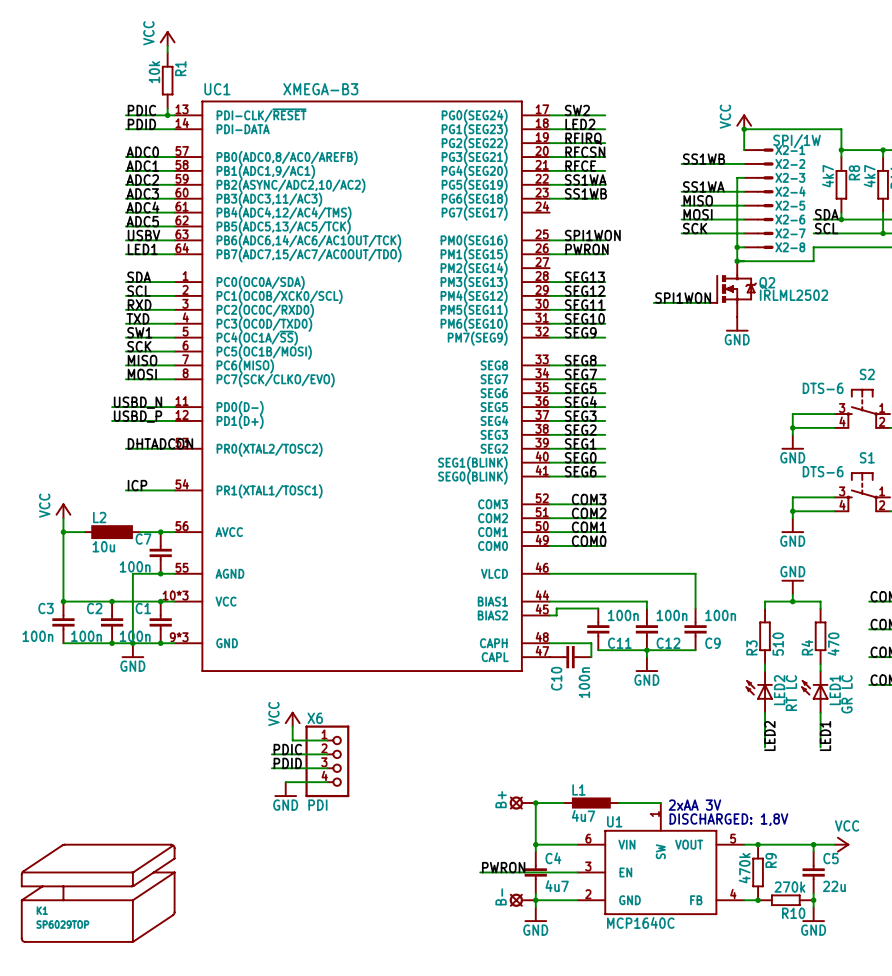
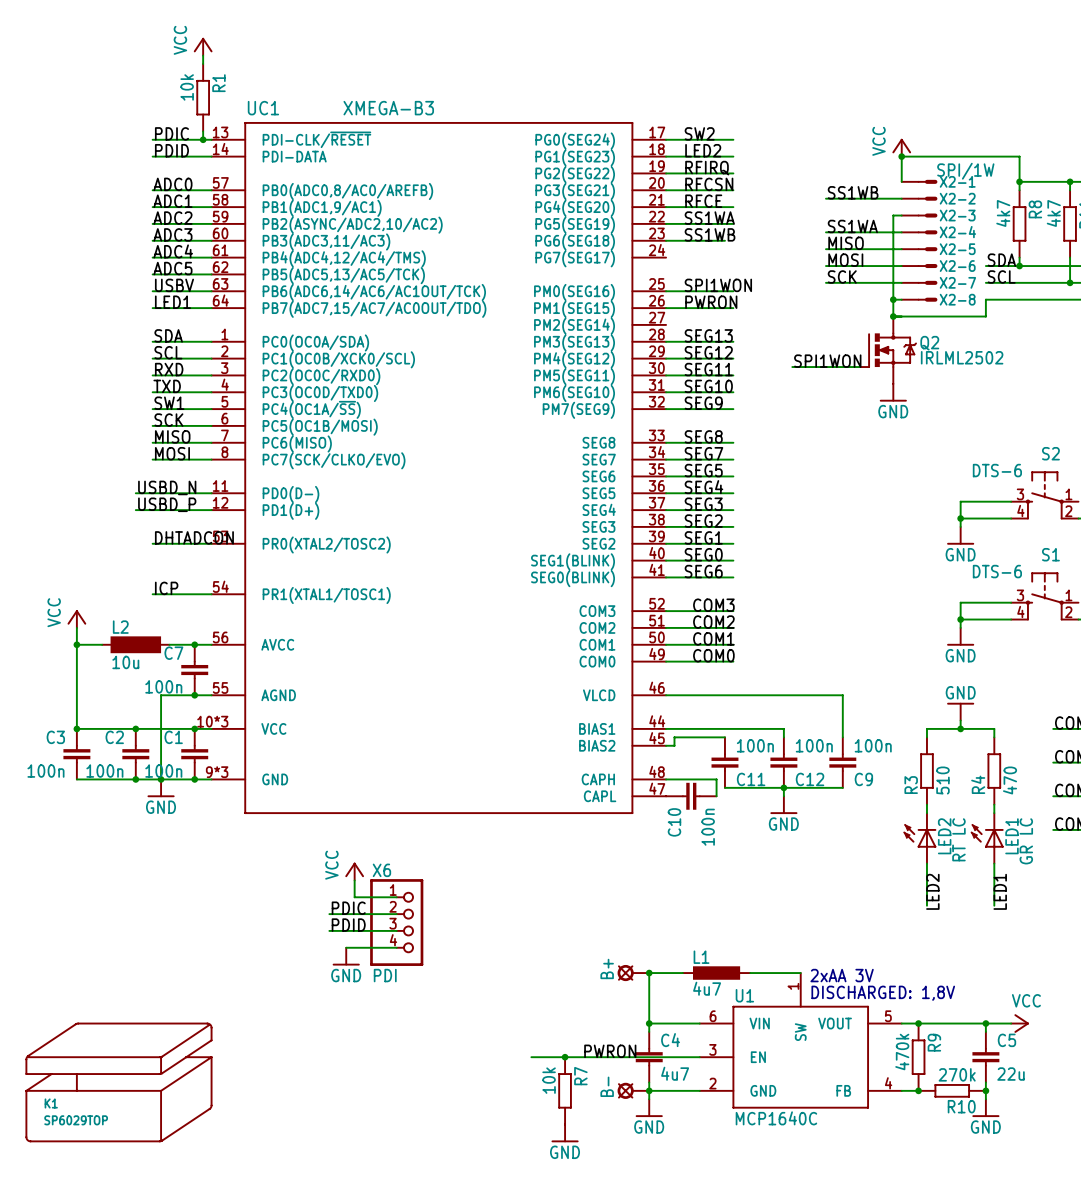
wire: none -> (531, 1057) (581, 1057)
junction: none -> (565, 1057)
R7: none -> 10k (565, 1090)
power symbol: none -> GND (565, 1133)

